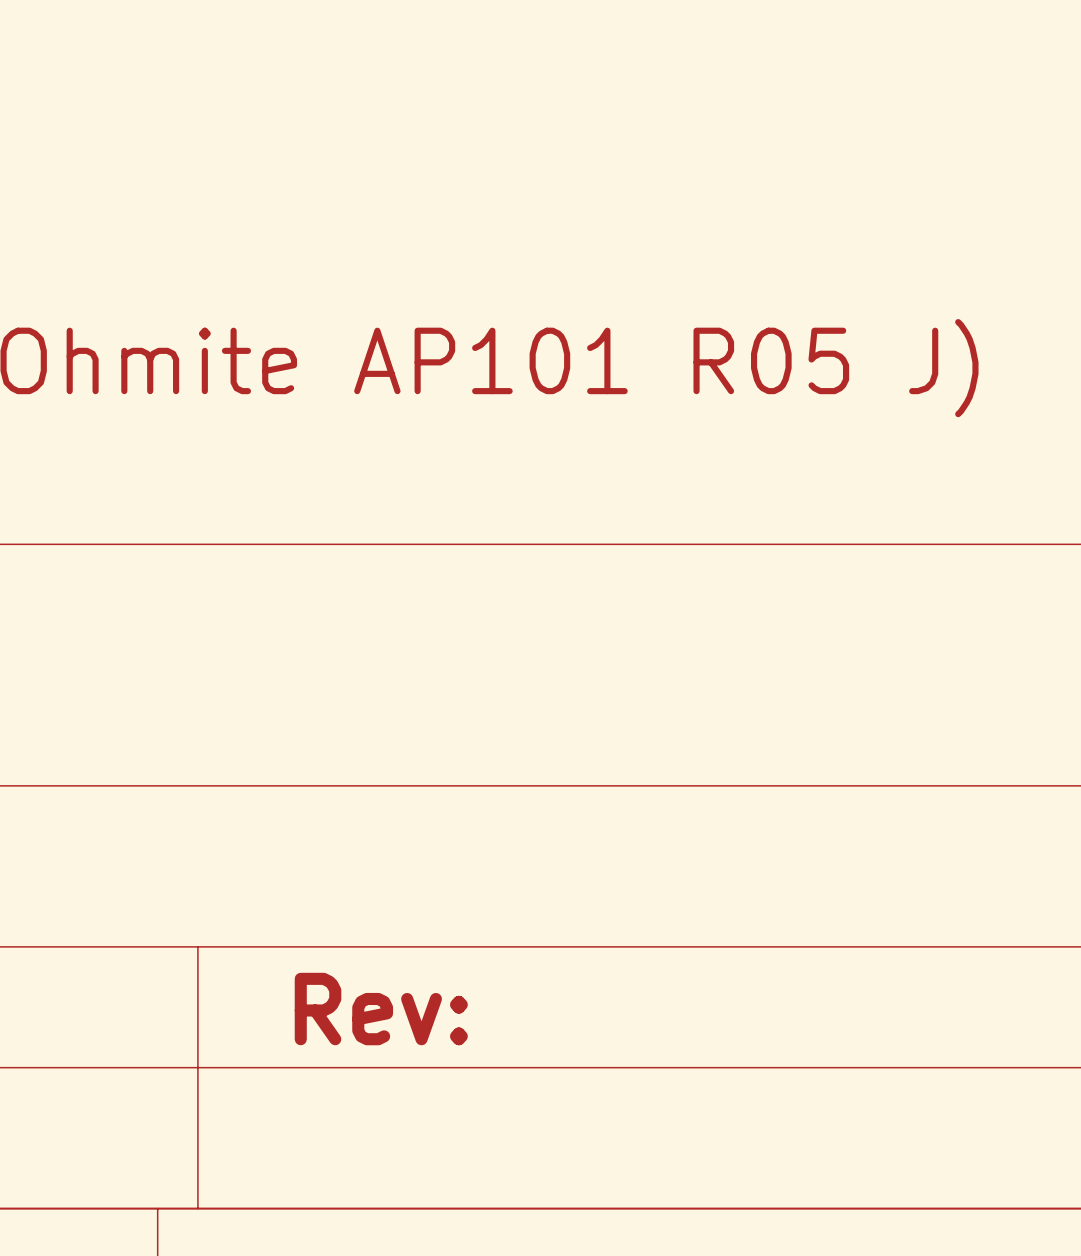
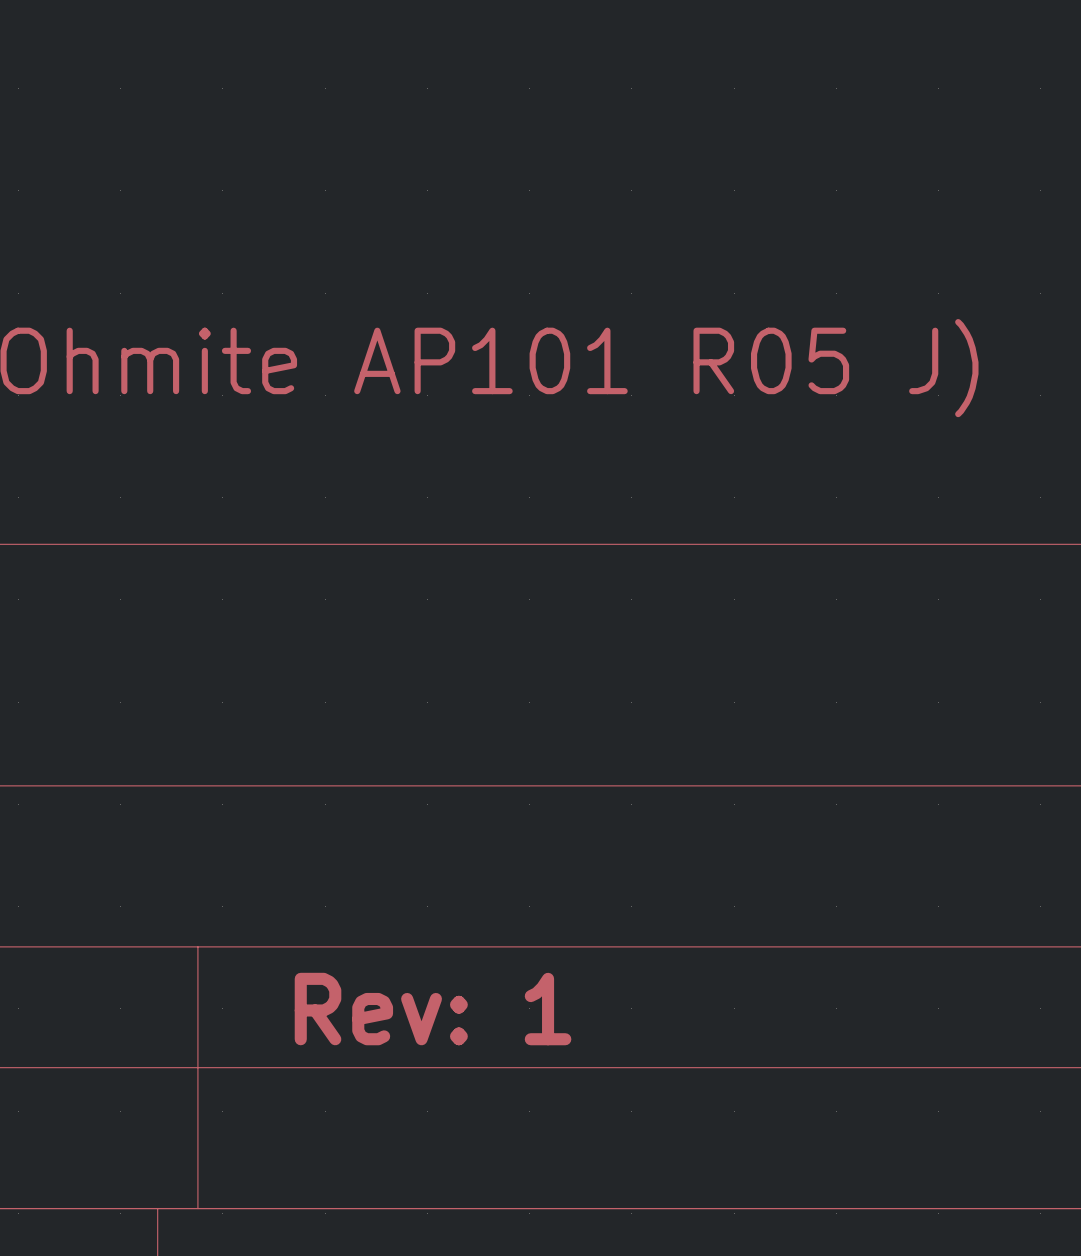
title block: Rev: (381, 1009) -> Rev: 1 (433, 1009)

